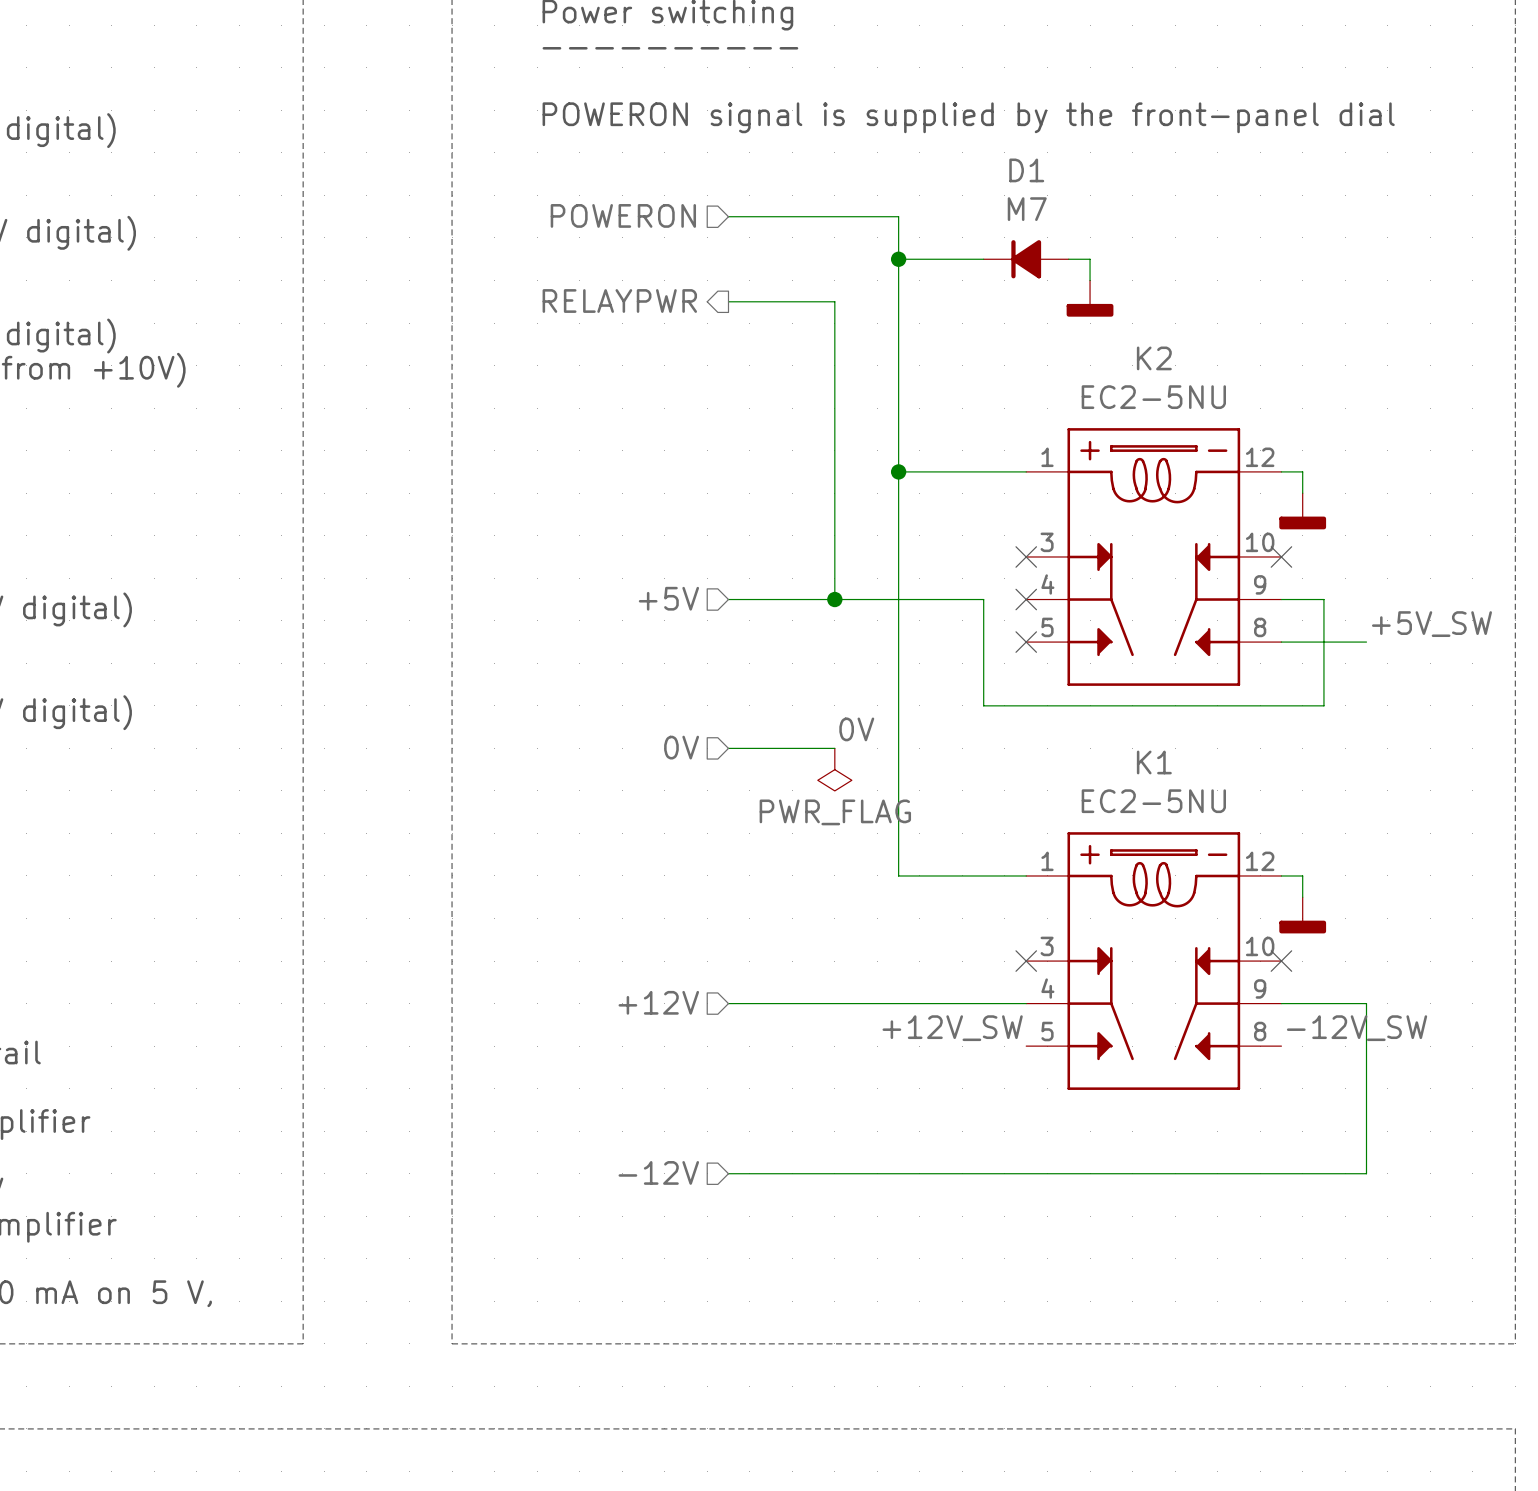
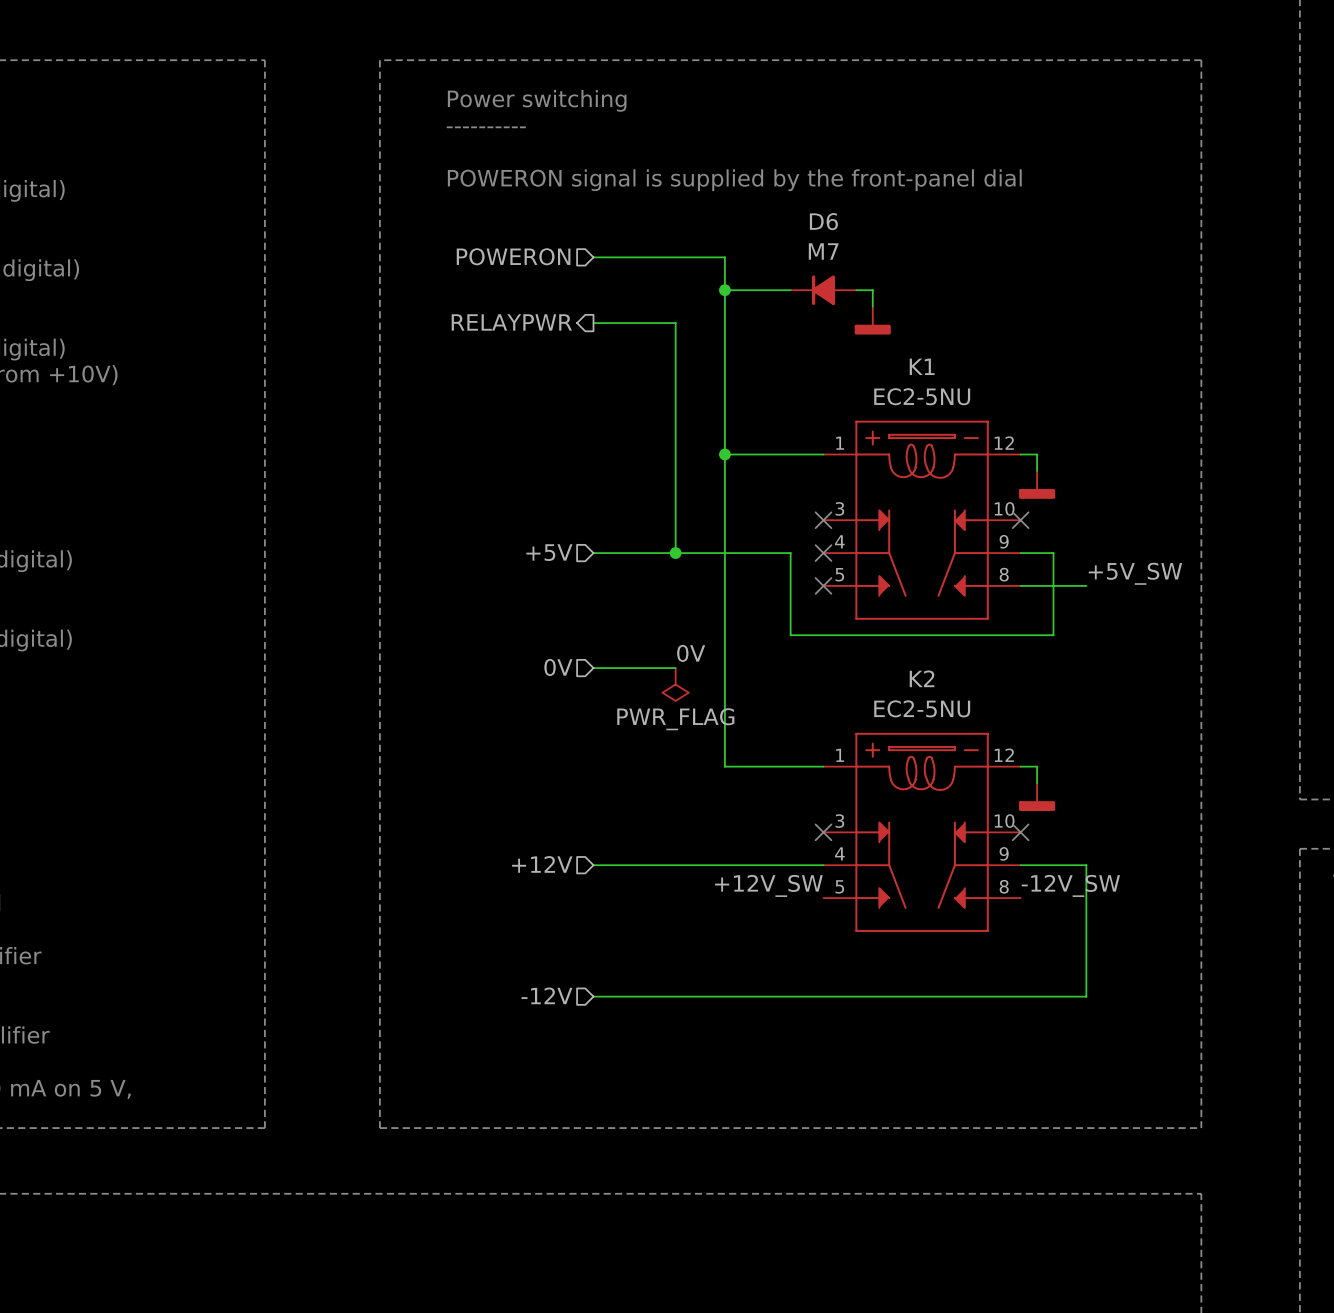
D1 name: D1 (1026, 170) -> D6 (823, 221)
K2 name: K2 (1154, 358) -> K1 (922, 366)
K1 name: K1 (1154, 762) -> K2 (922, 678)

